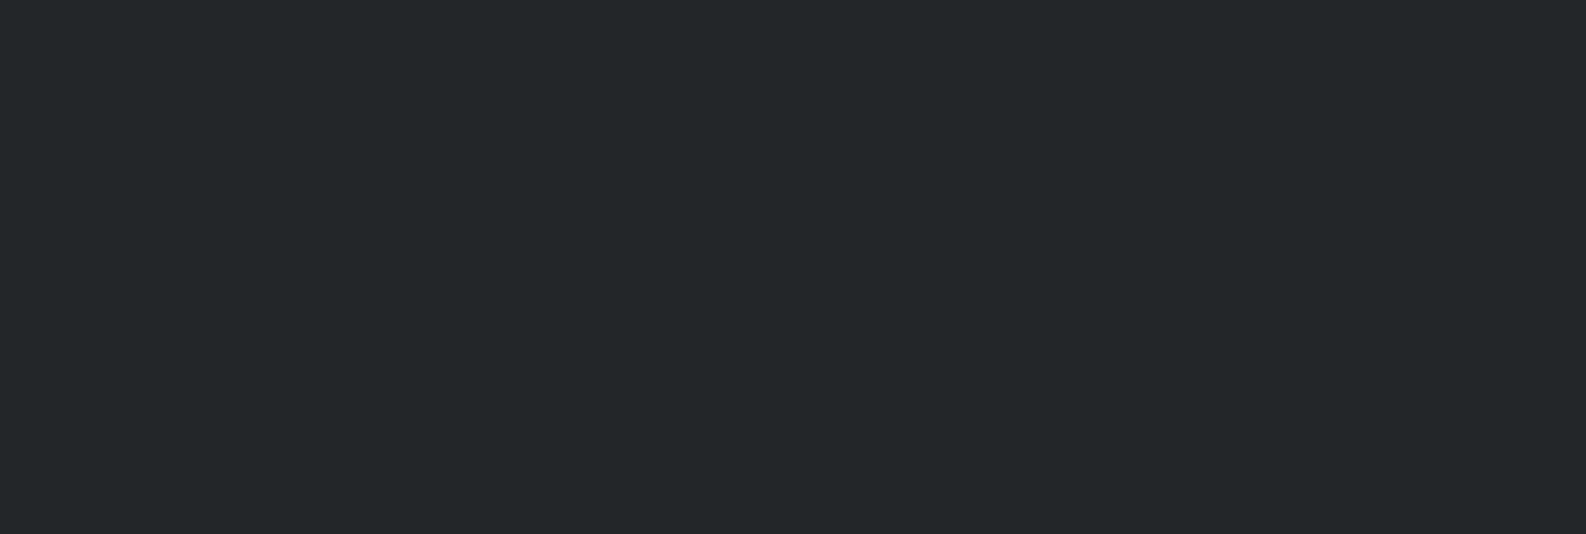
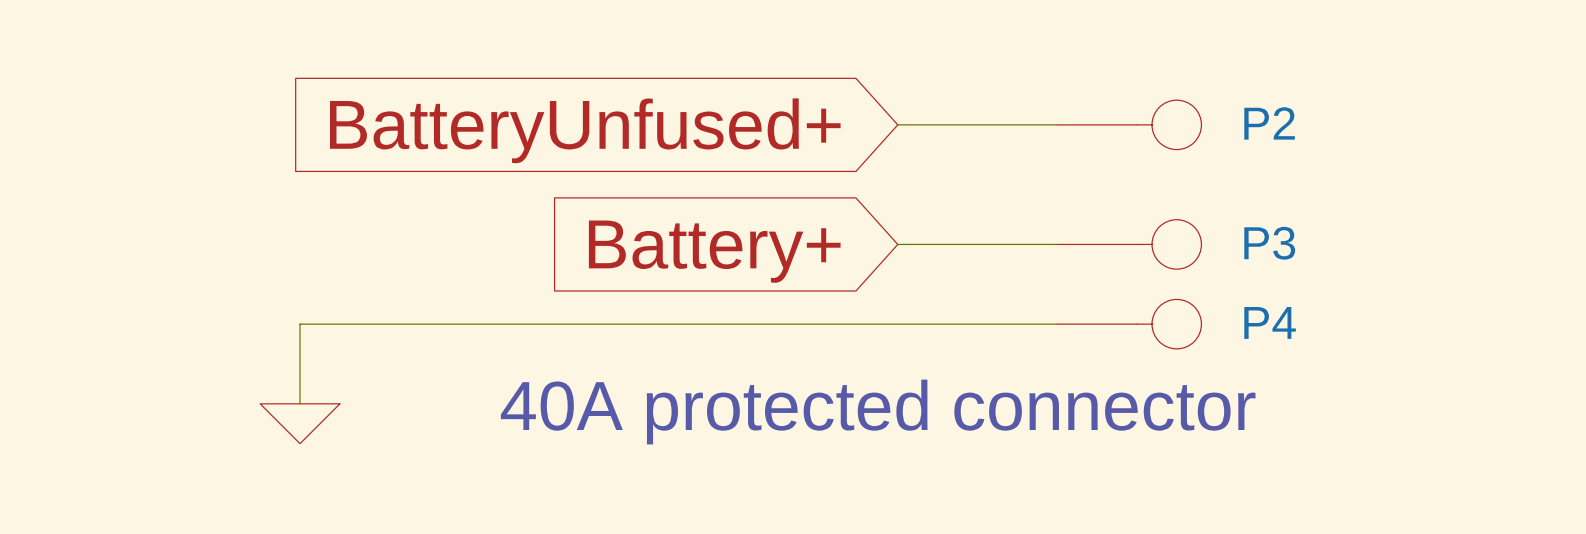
wire: none -> (897, 124) (1057, 124)
P2: none -> (1129, 124)
global label: none -> BatteryUnfused+ (585, 130)
wire: none -> (897, 244) (1057, 244)
P3: none -> (1129, 244)
global label: none -> Battery+ (714, 251)
wire: none -> (1057, 324) (300, 324) (300, 403)
P4: none -> (1129, 324)
text: none -> 40A protected connector (878, 412)
power symbol: none -> (300, 423)

